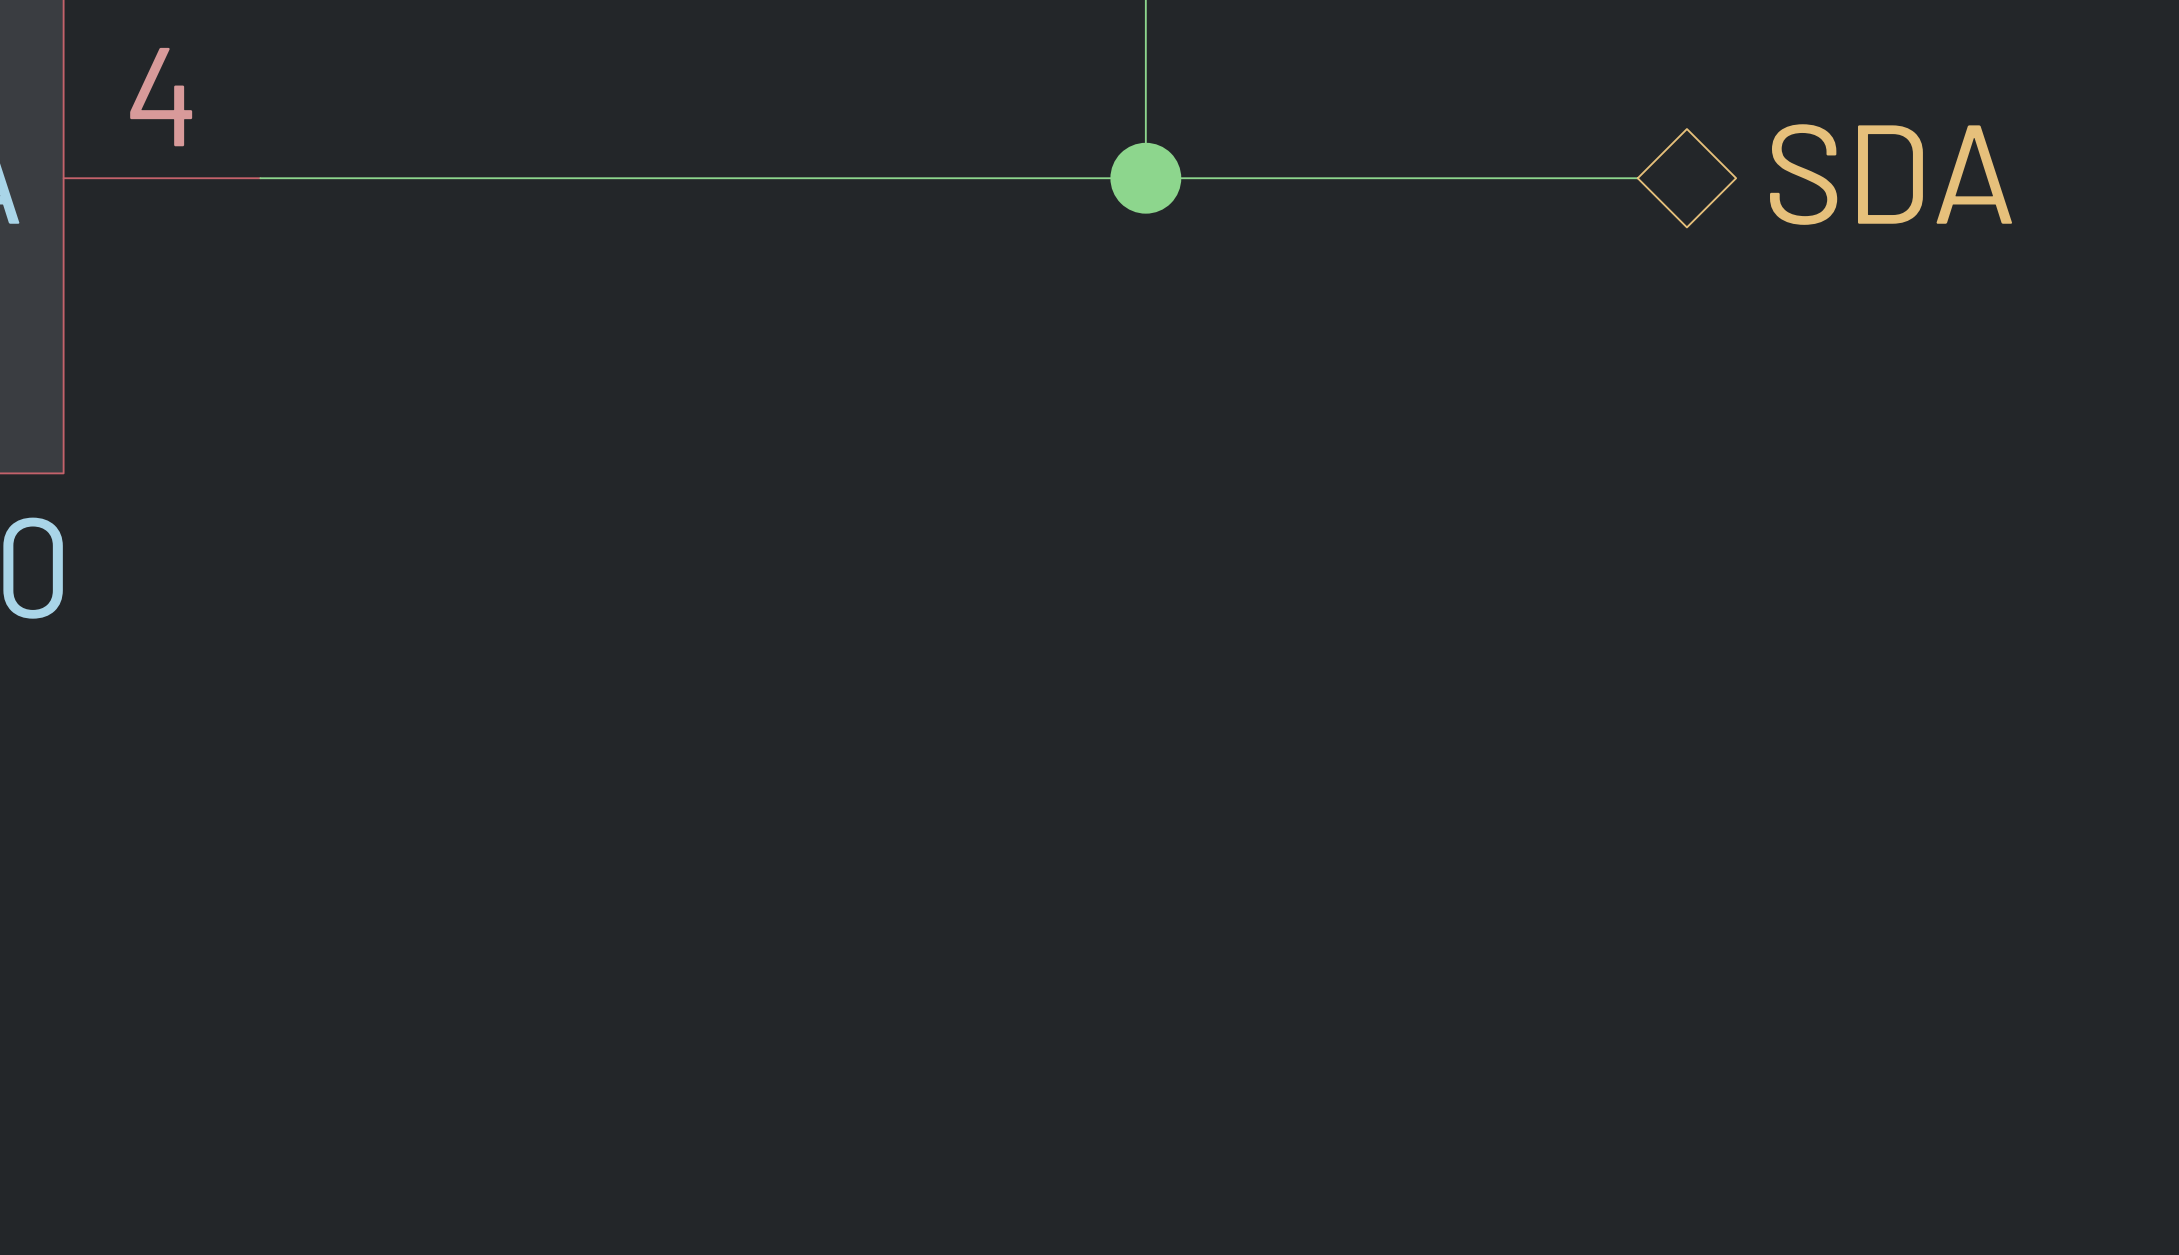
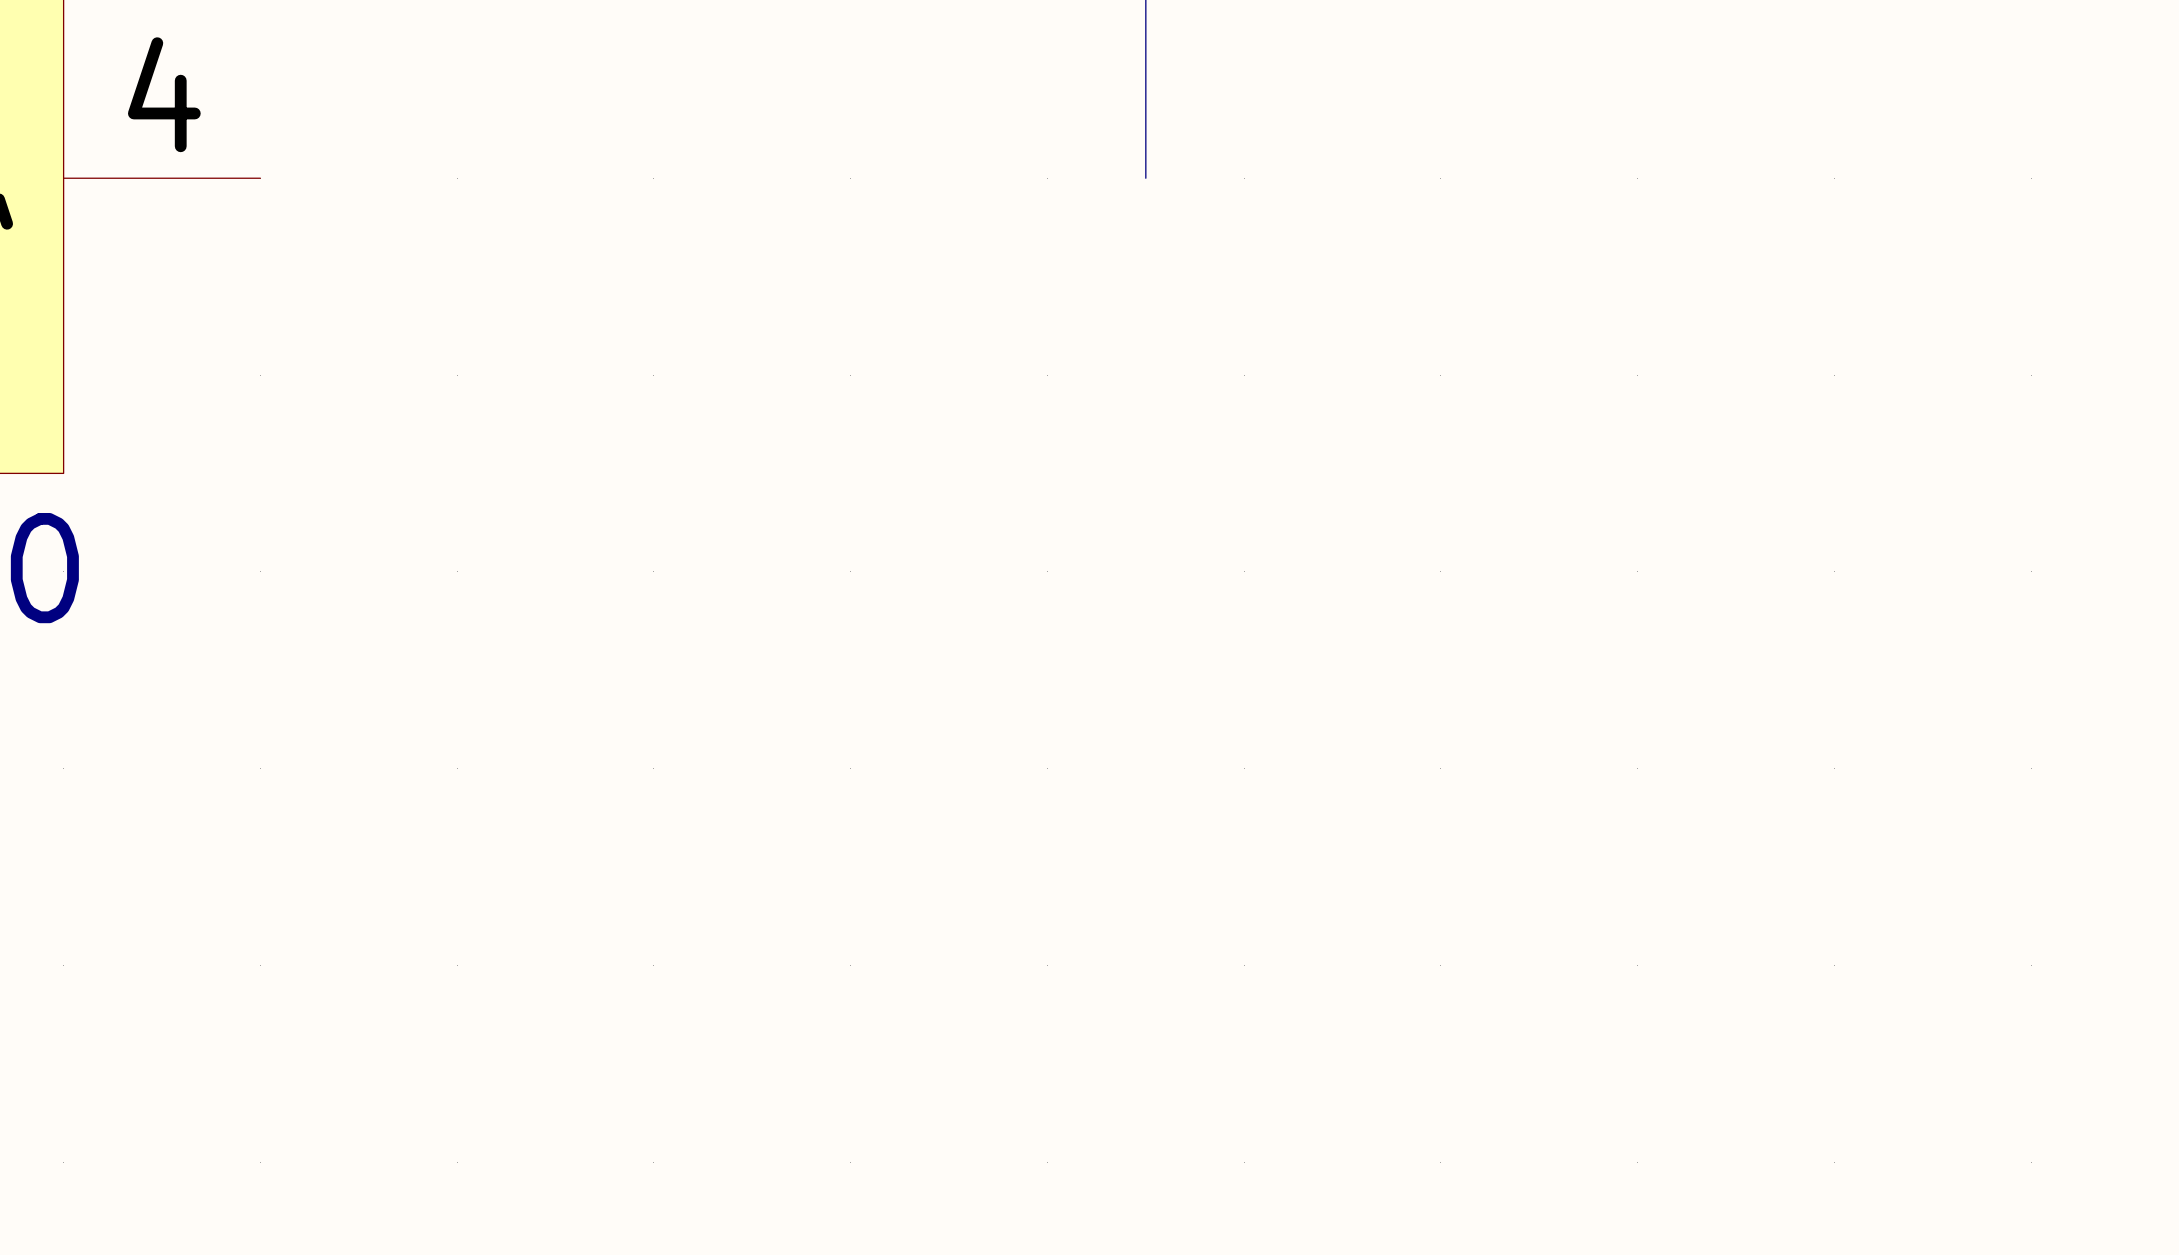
hierarchical label: SDA (1891, 174) -> none
wire: (260, 178) (1637, 178) -> none
junction: (1145, 178) -> none

